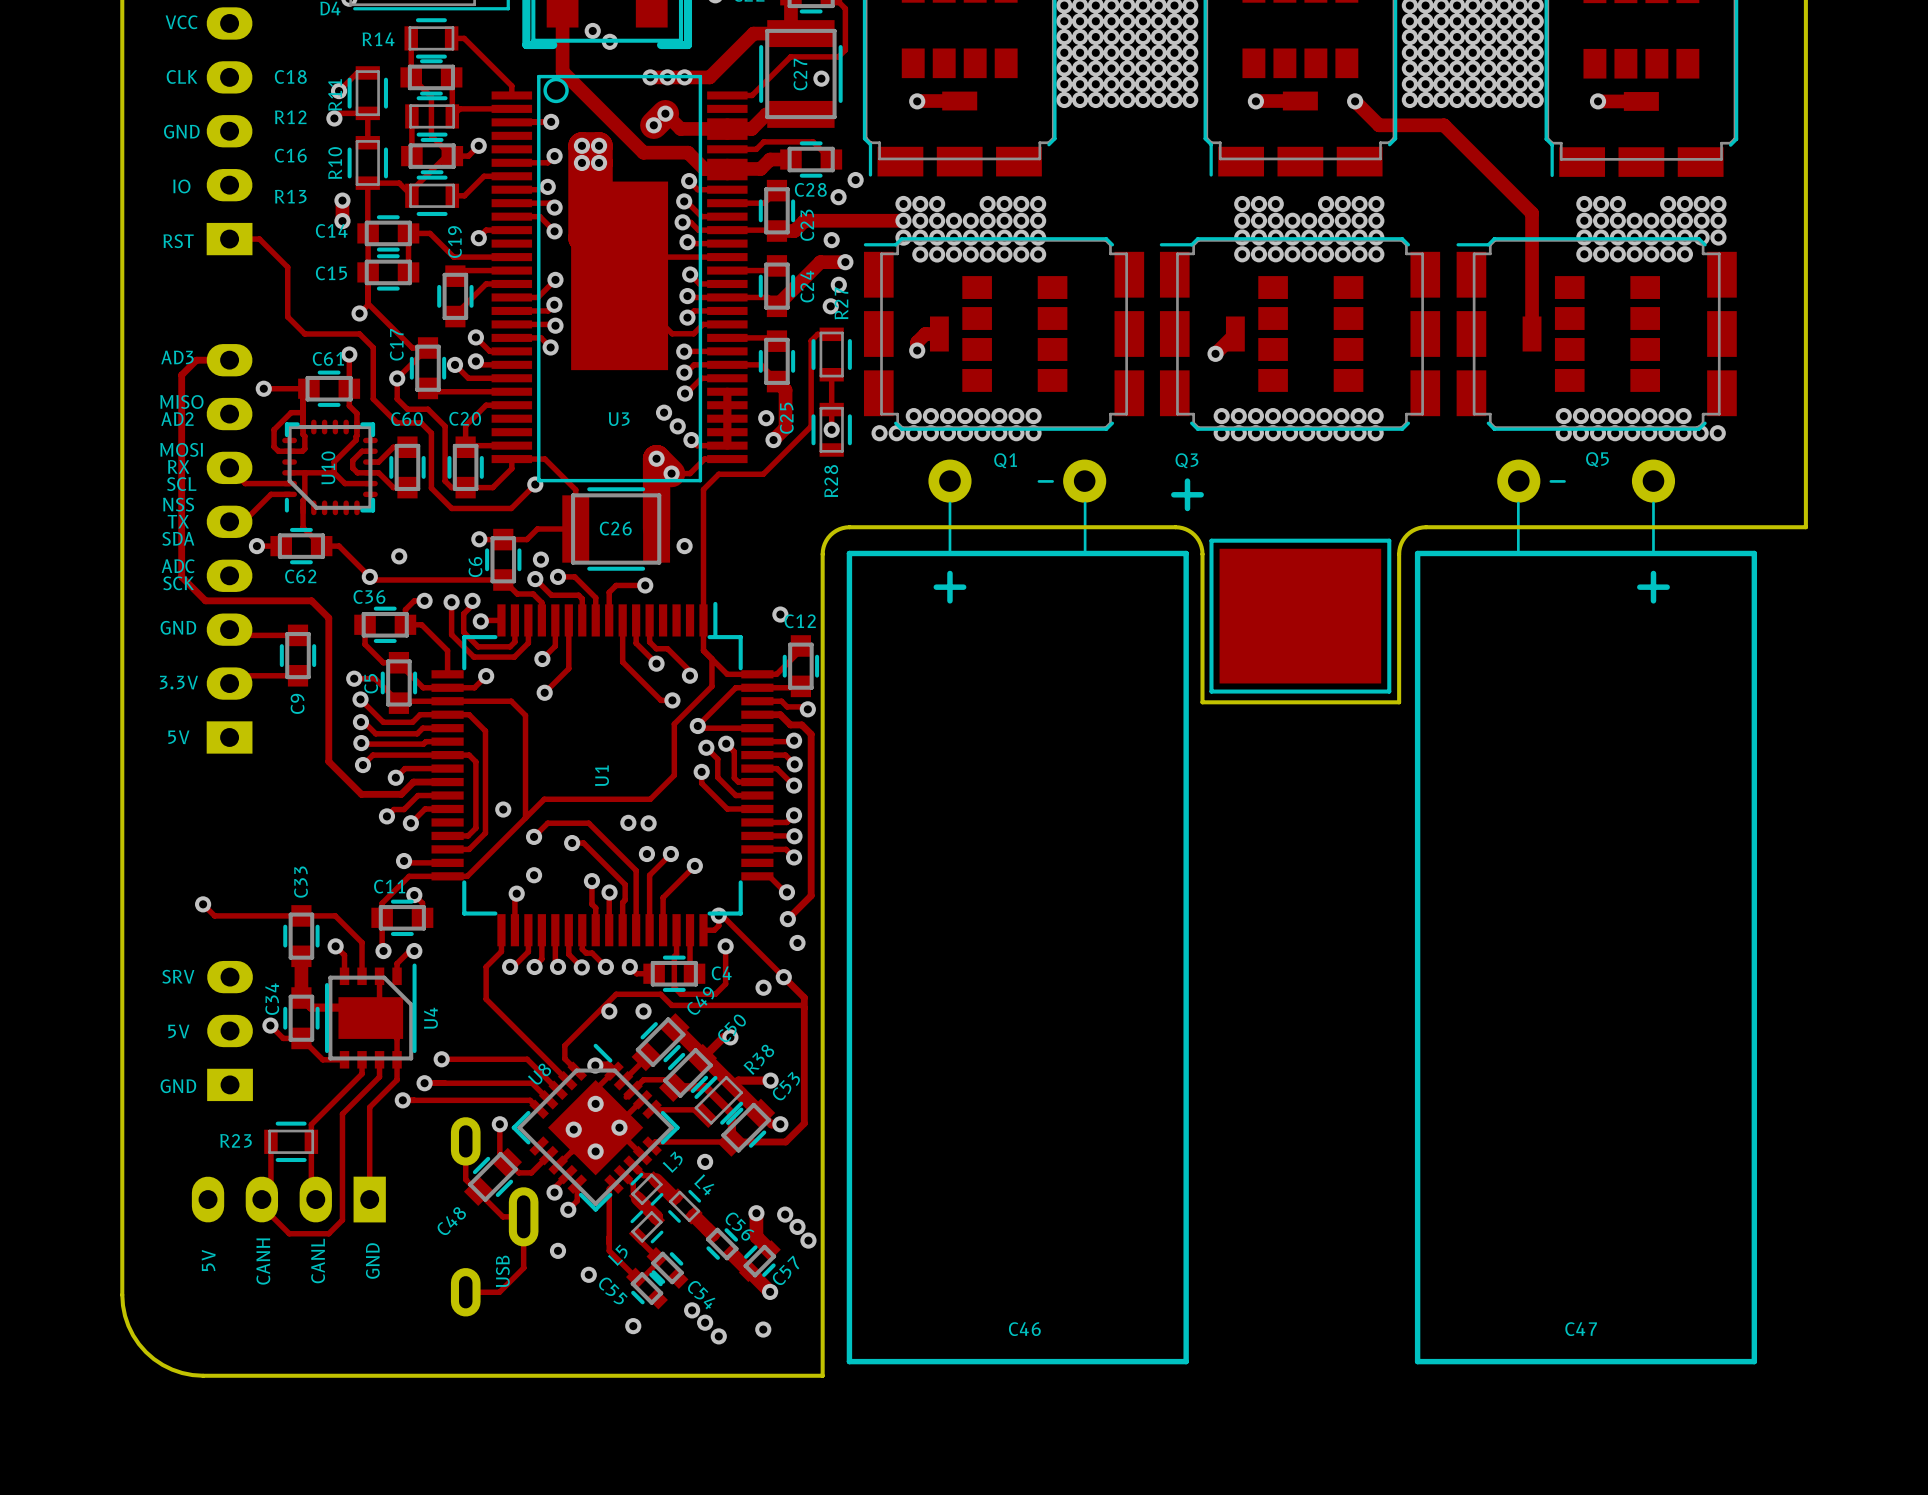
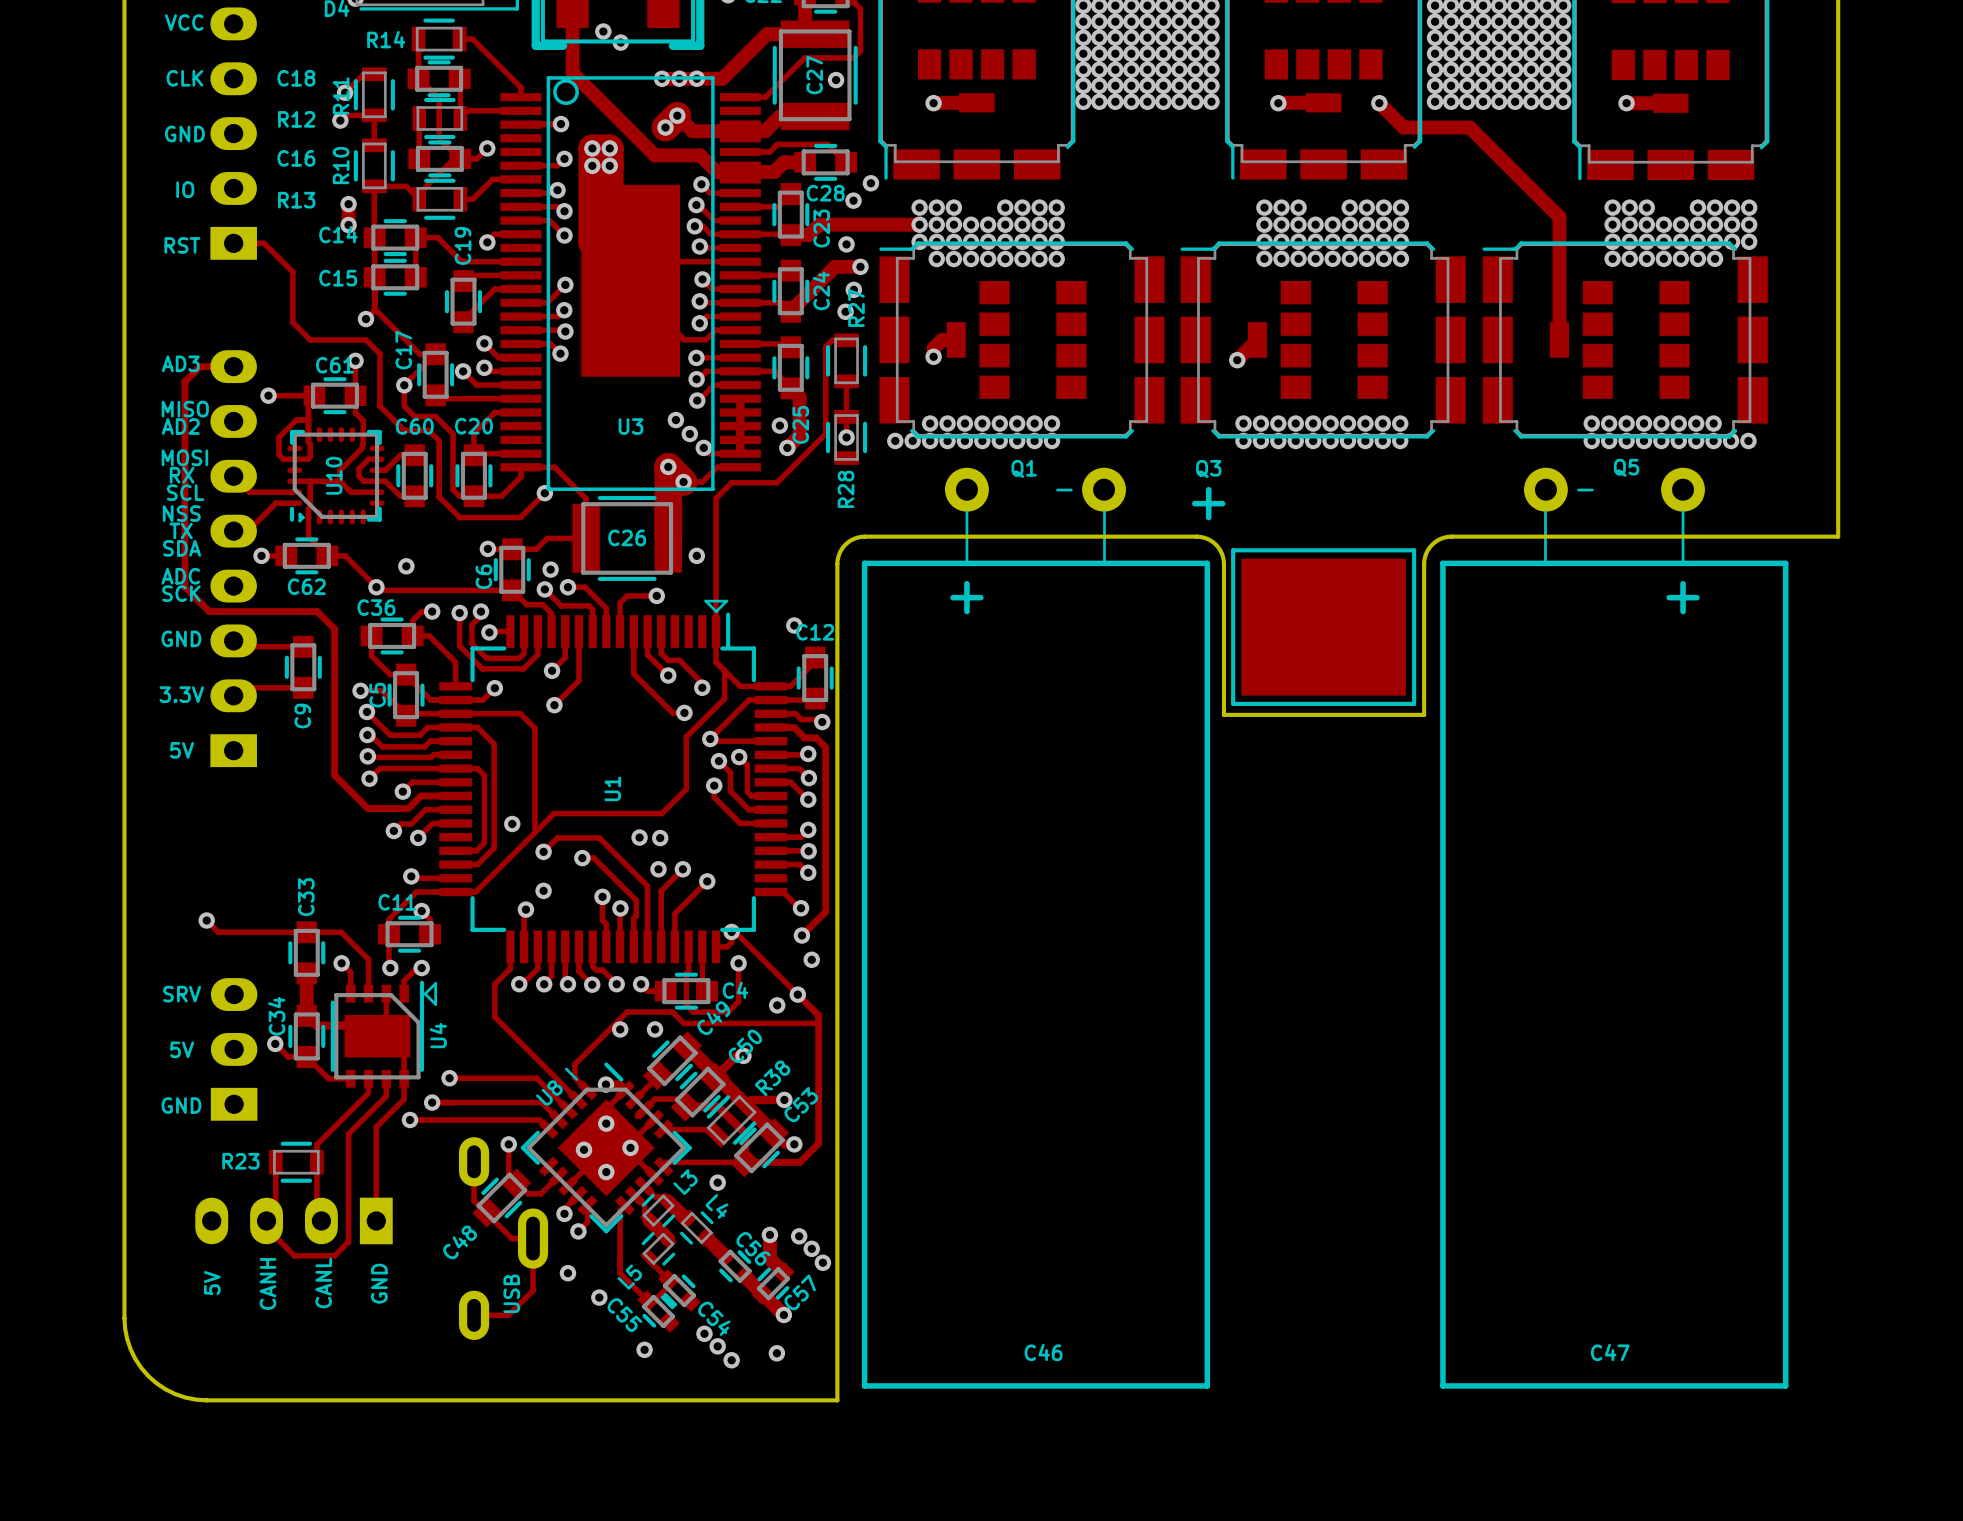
line: none -> (299, 514) (299, 521) (303, 517) (299, 514)
line: none -> (705, 601) (716, 611) (726, 601) (705, 601)
line: none -> (435, 983) (425, 993) (435, 1004) (435, 983)
line: none -> (566, 1068) (576, 1079)

